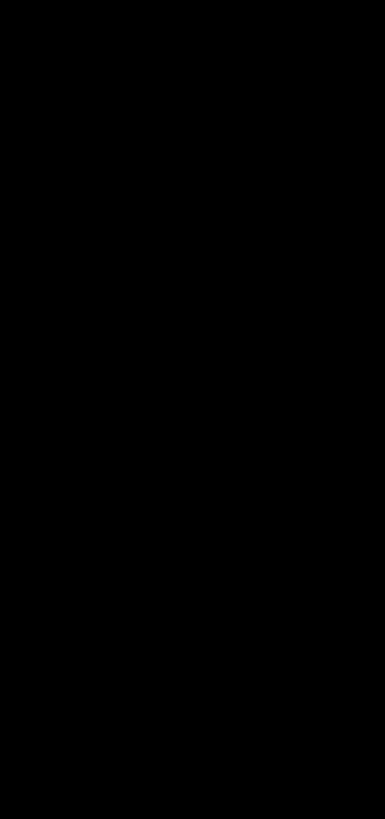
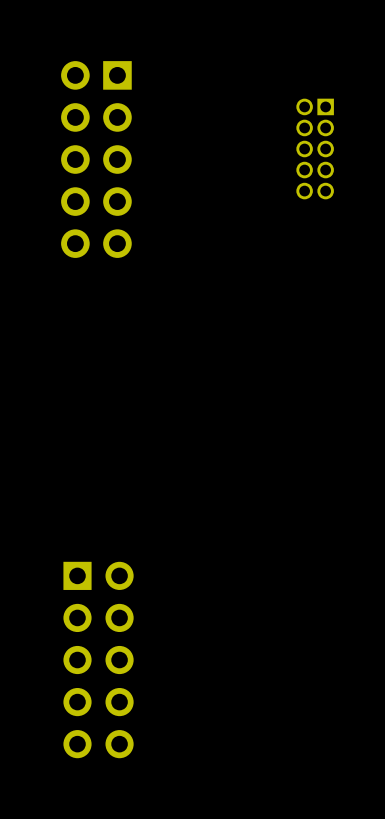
part: none -> (315, 149)
part: none -> (96, 159)
part: none -> (98, 660)

